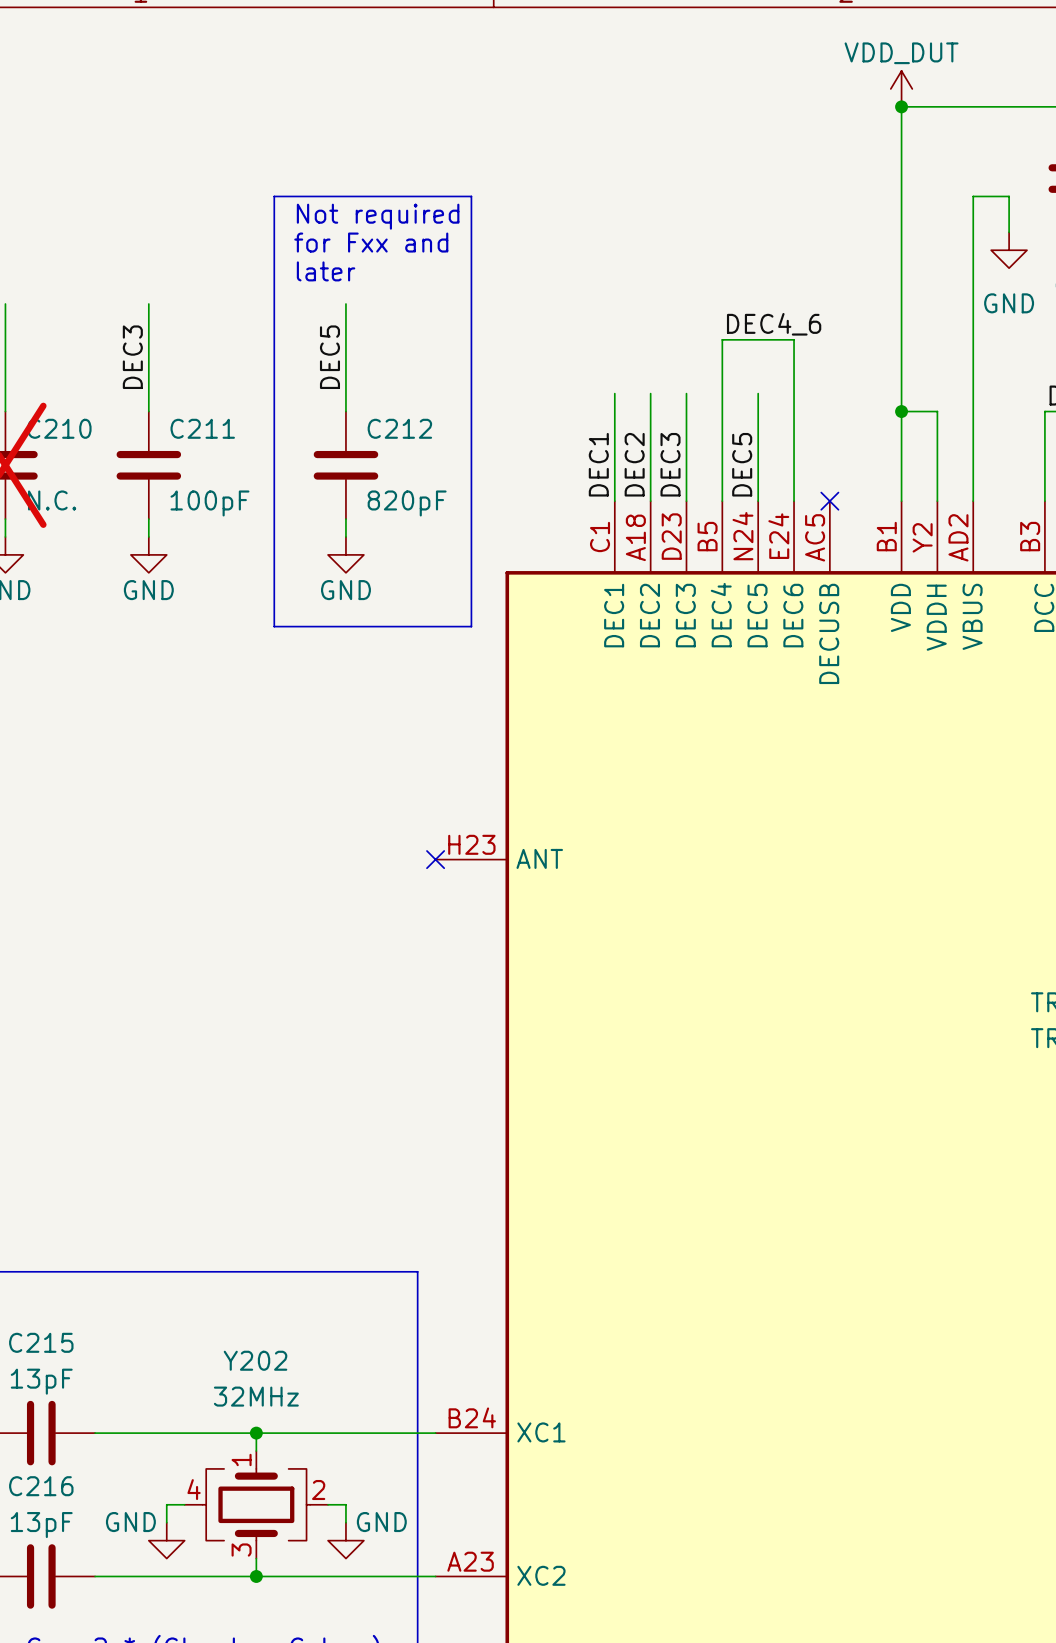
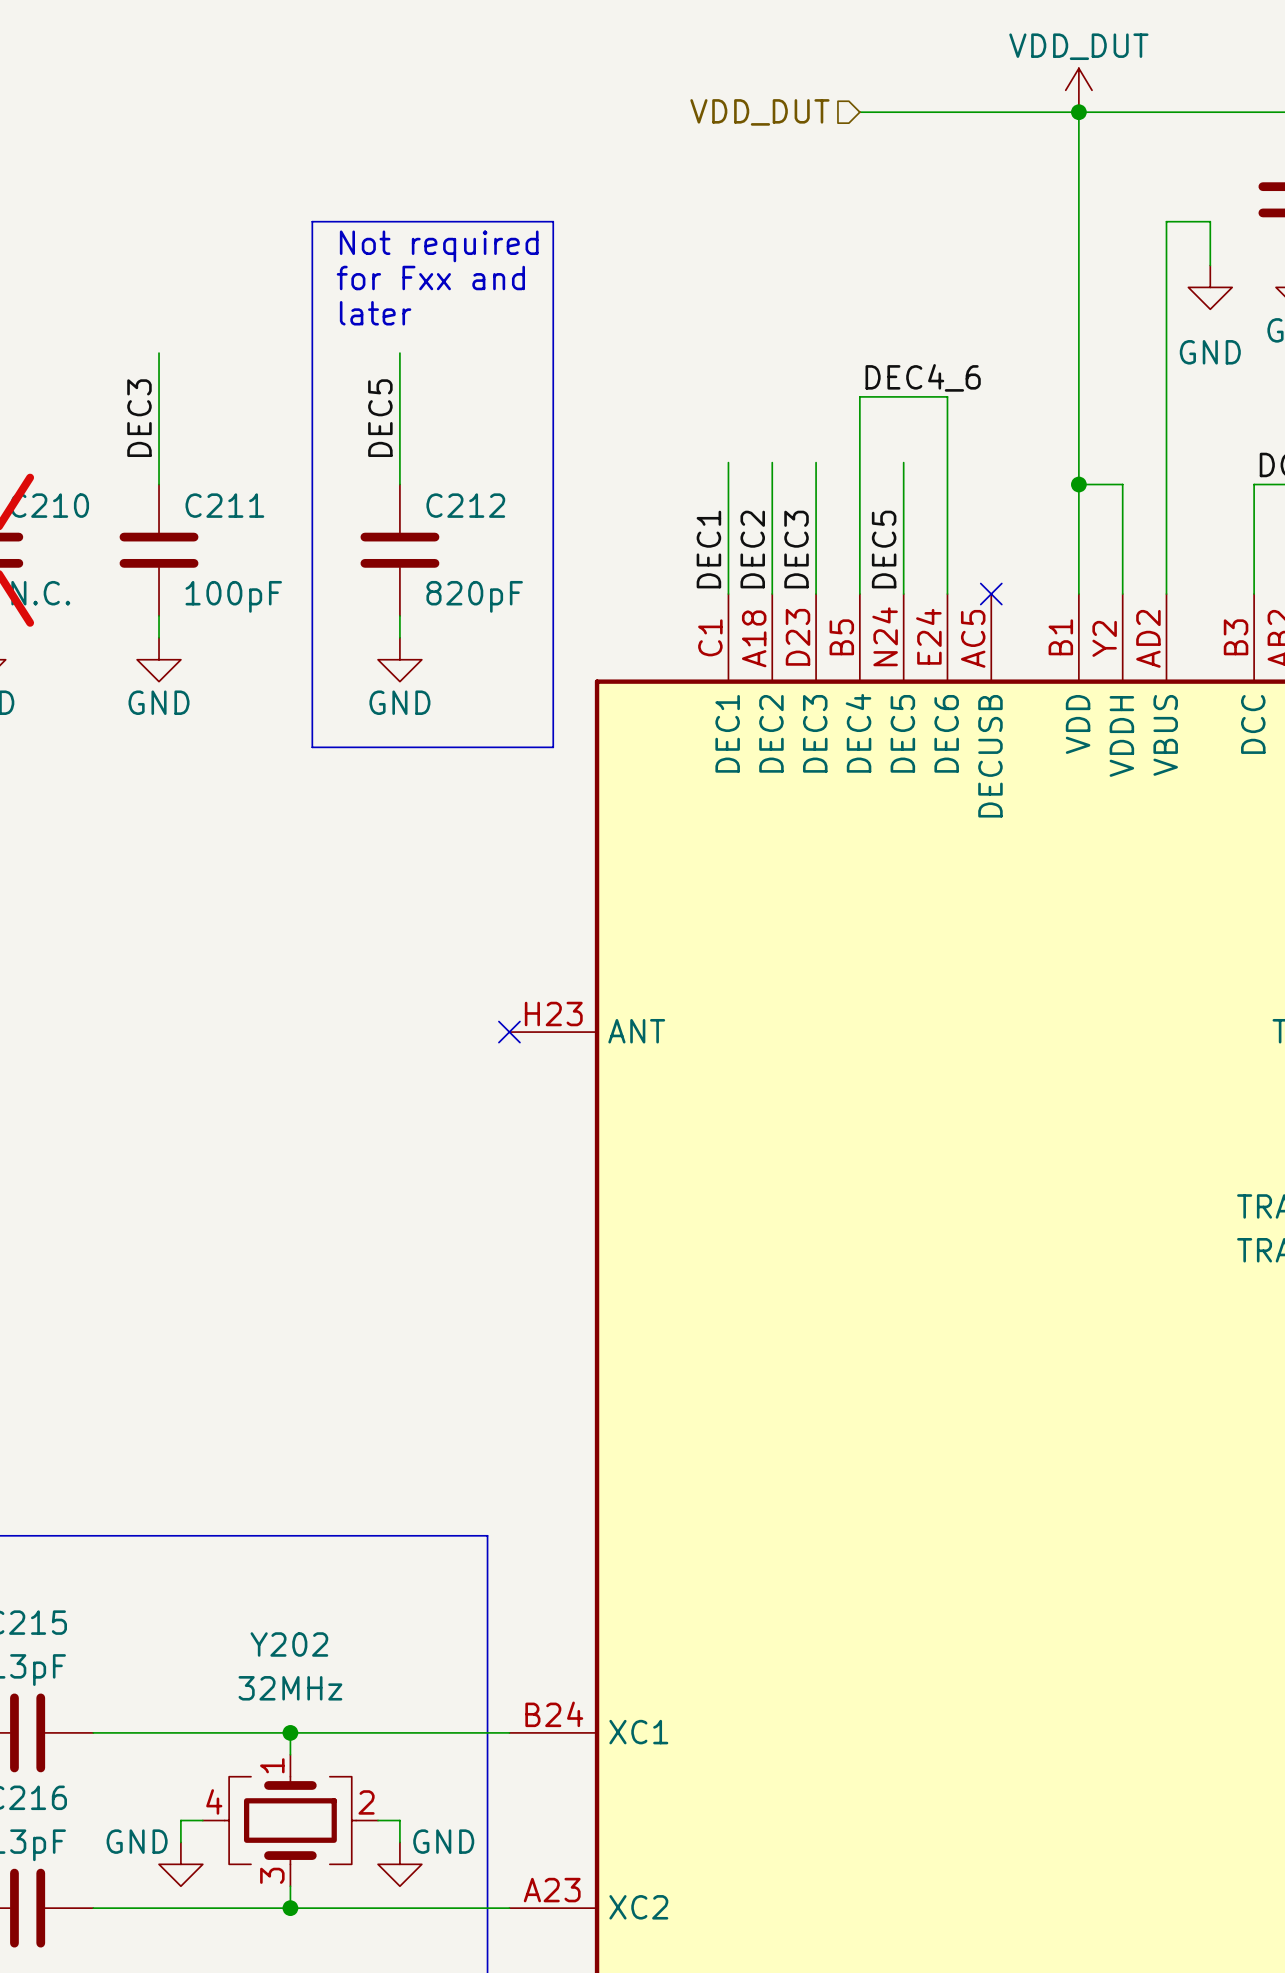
wire: none -> (859, 112) (1078, 112)
hierarchical label: none -> VDD_DUT (759, 112)

